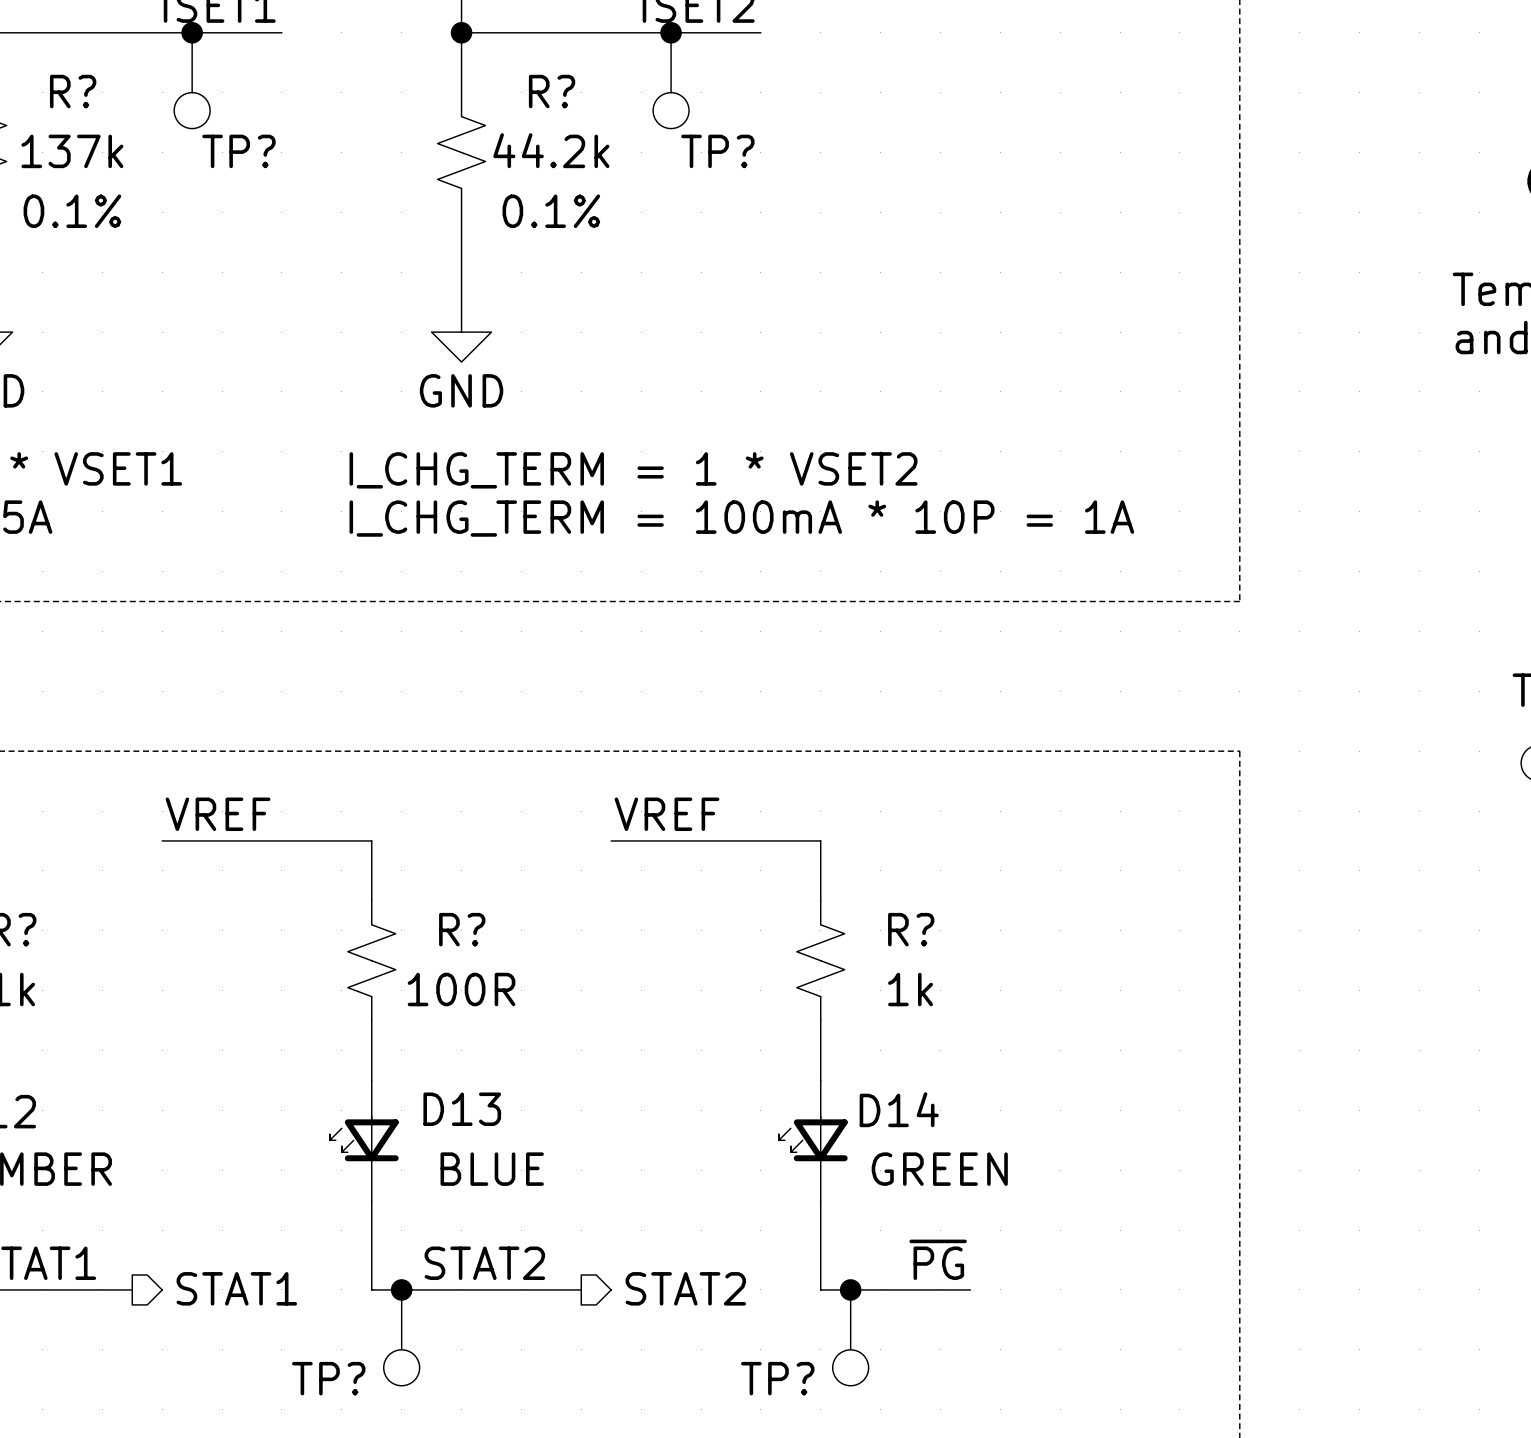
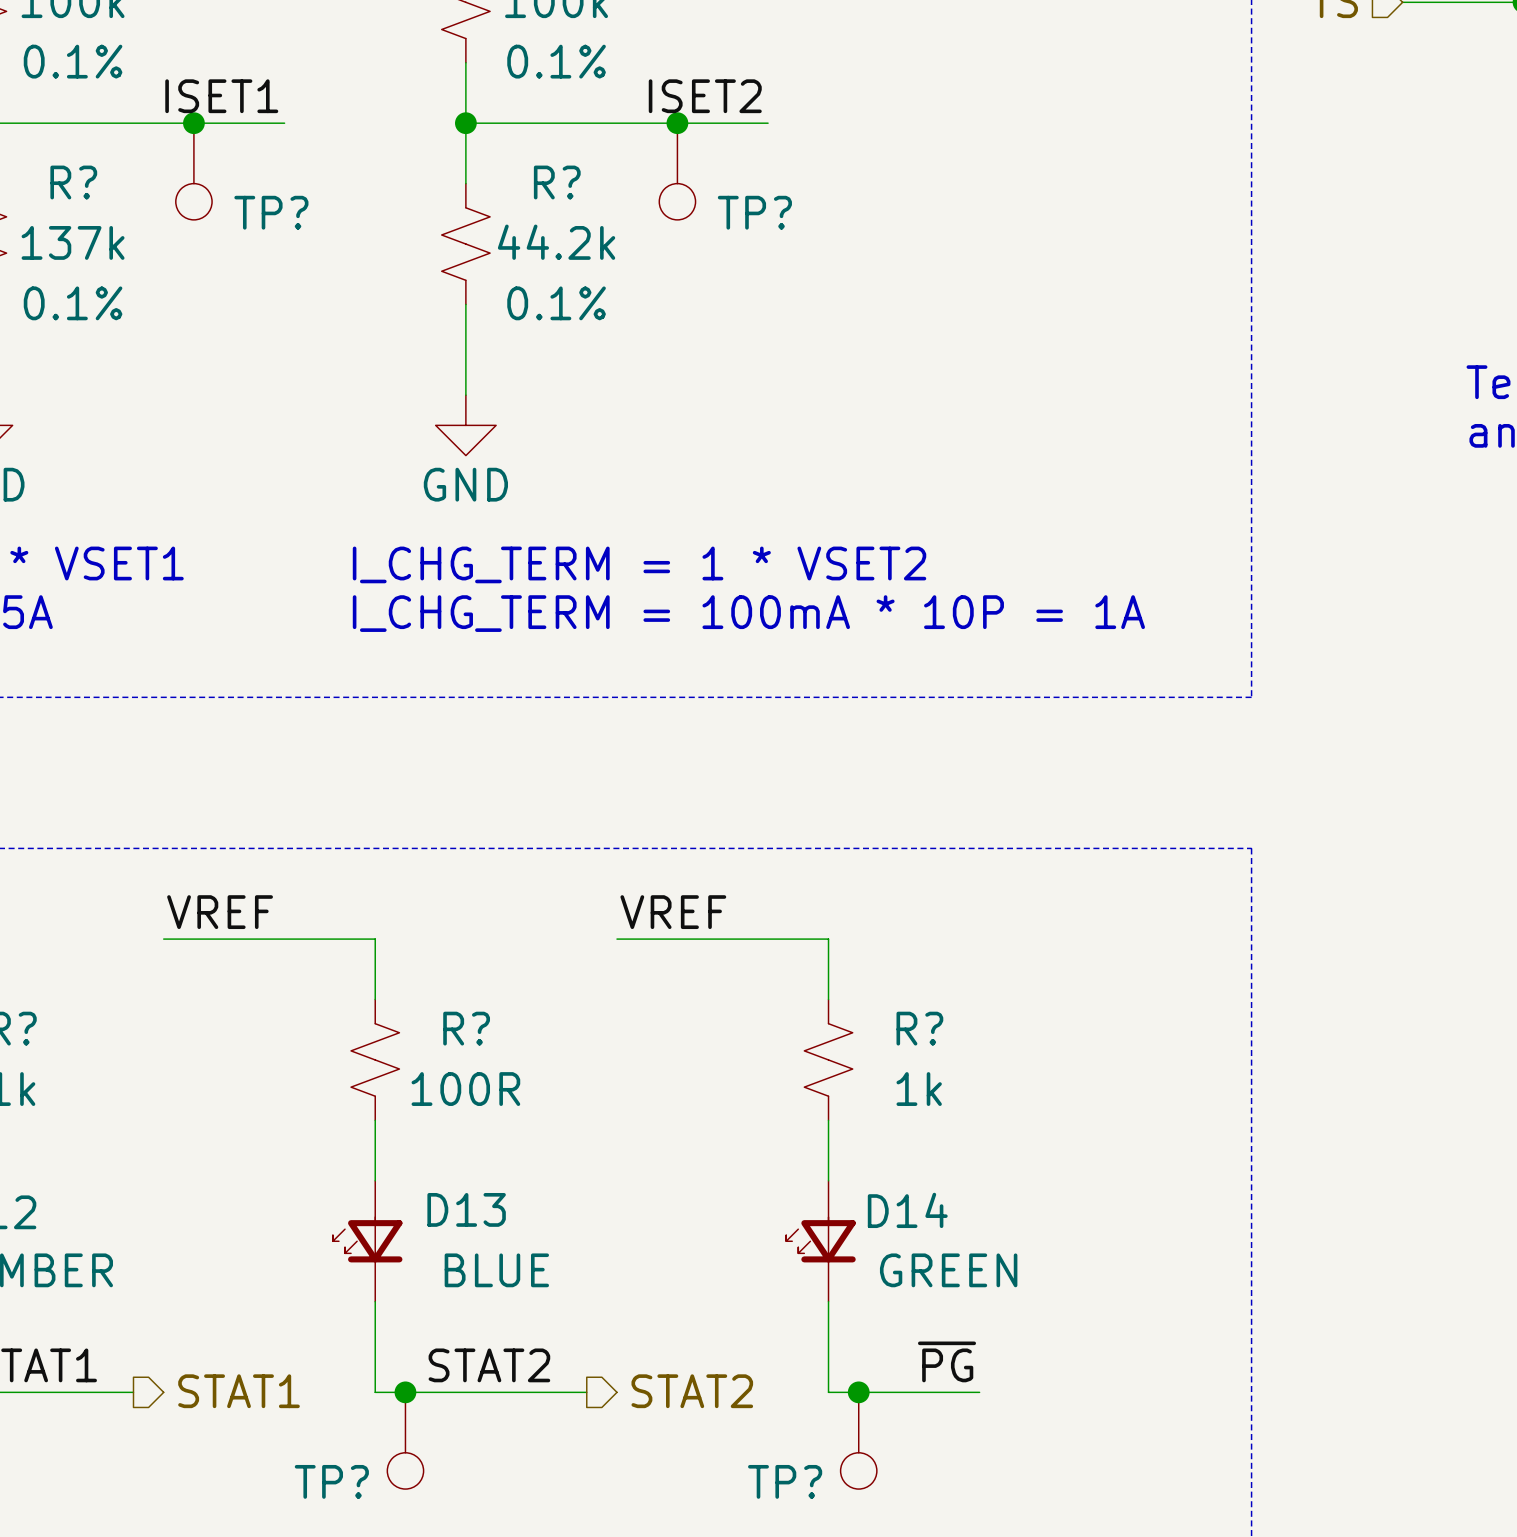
TP? name position: TP? (238, 151) -> TP? (271, 212)
TP? name position: TP? (717, 151) -> TP? (754, 212)

